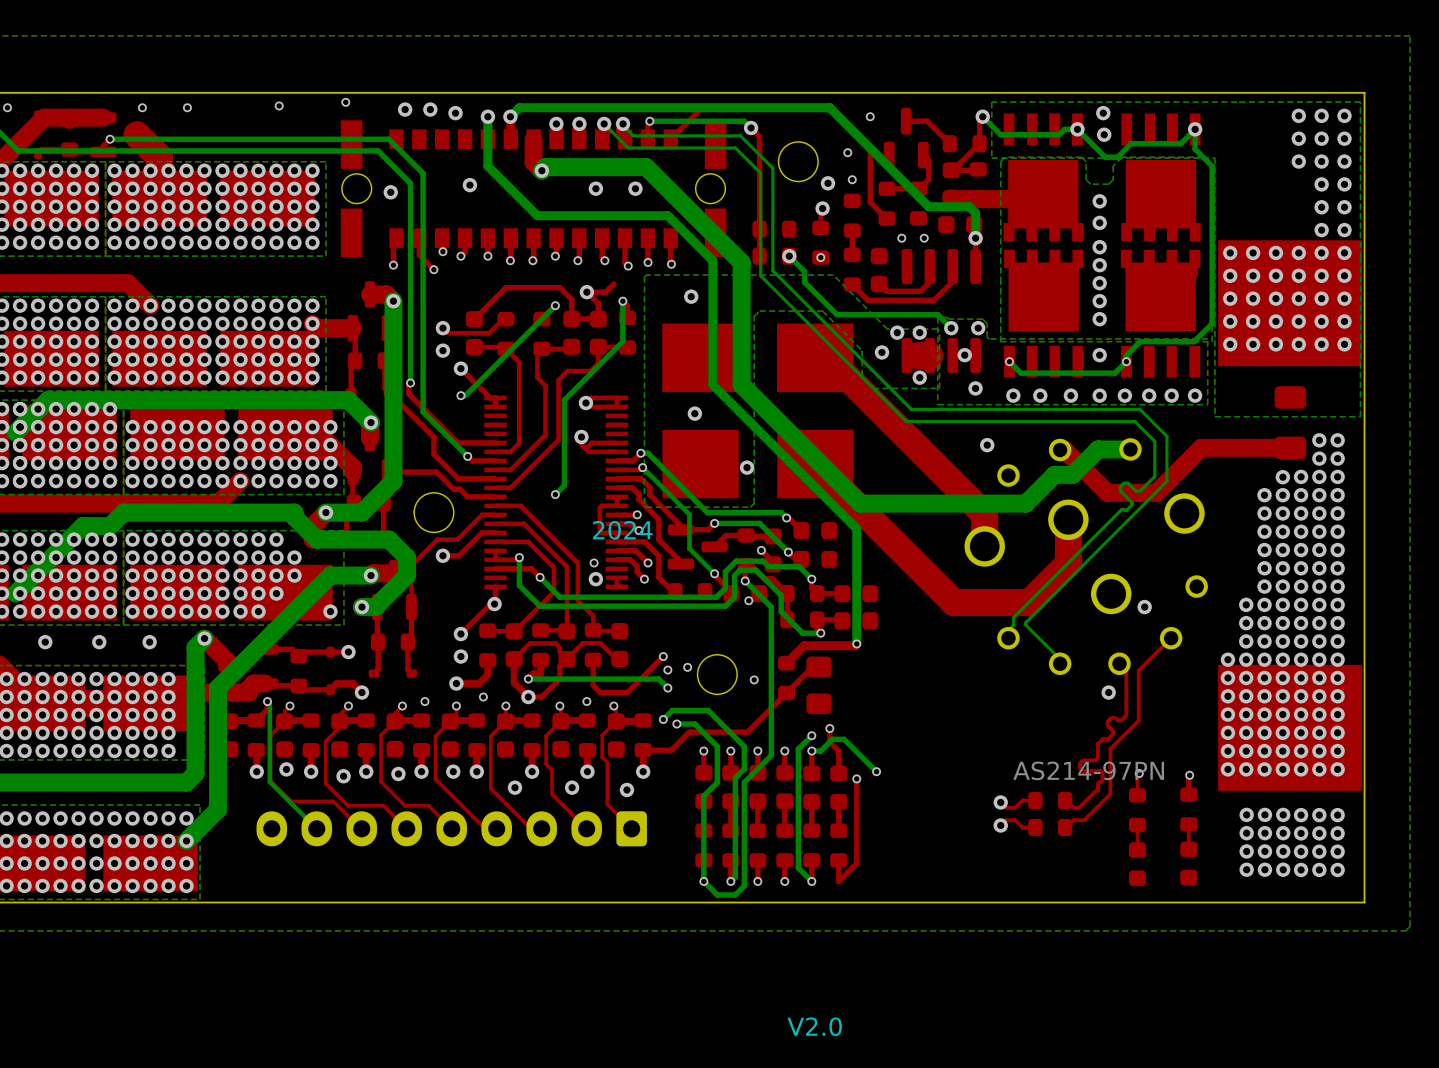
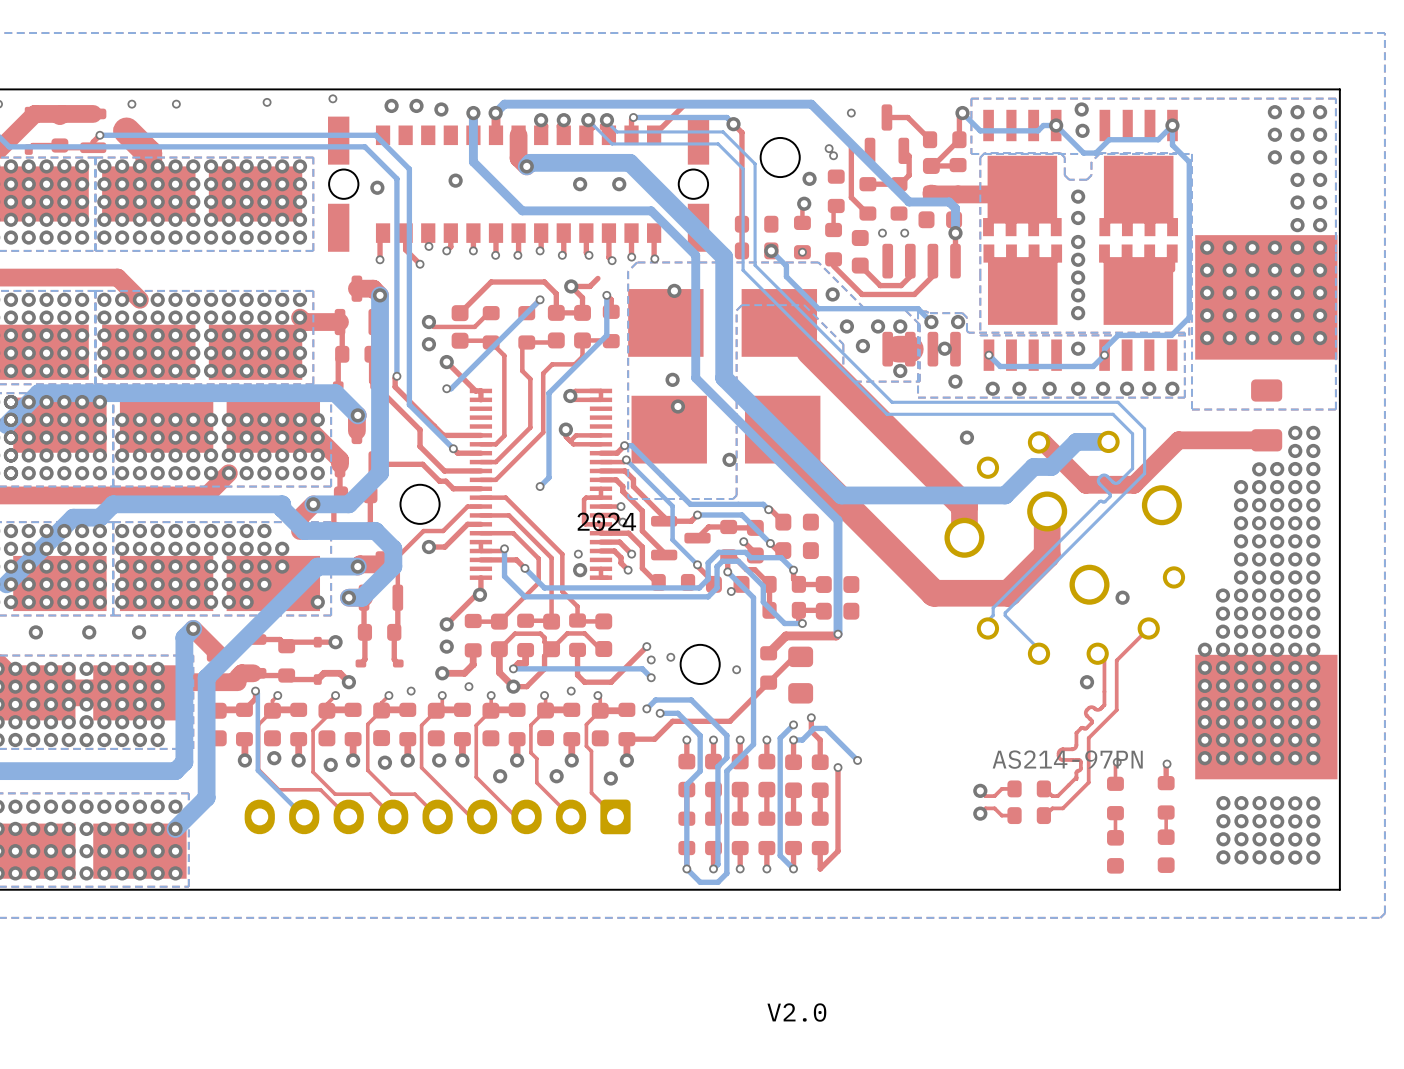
via position: (852, 179) -> (833, 155)
part: none -> (836, 191)
top track: none -> (836, 205) (833, 208) (833, 225)
part: (852, 215) -> none
top track: (852, 235) (852, 254) -> none
part: none -> (833, 244)
part: (852, 269) -> none
part position: (879, 270) -> (860, 251)
bottom zone outline: (646, 275) (833, 275) (887, 329) (937, 329) -> (629, 269) (637, 262) (818, 262) (864, 308) (903, 308) (918, 322)
top track: (852, 284) (868, 300) (881, 300) -> (833, 266) (862, 294)
top track: (879, 284) (886, 291) (899, 291) -> (860, 265) (880, 285)
via: none -> (832, 294)
via: none -> (846, 326)
part position: (757, 357) -> (722, 322)
via: none -> (672, 379)
part position: (758, 464) -> (725, 429)

